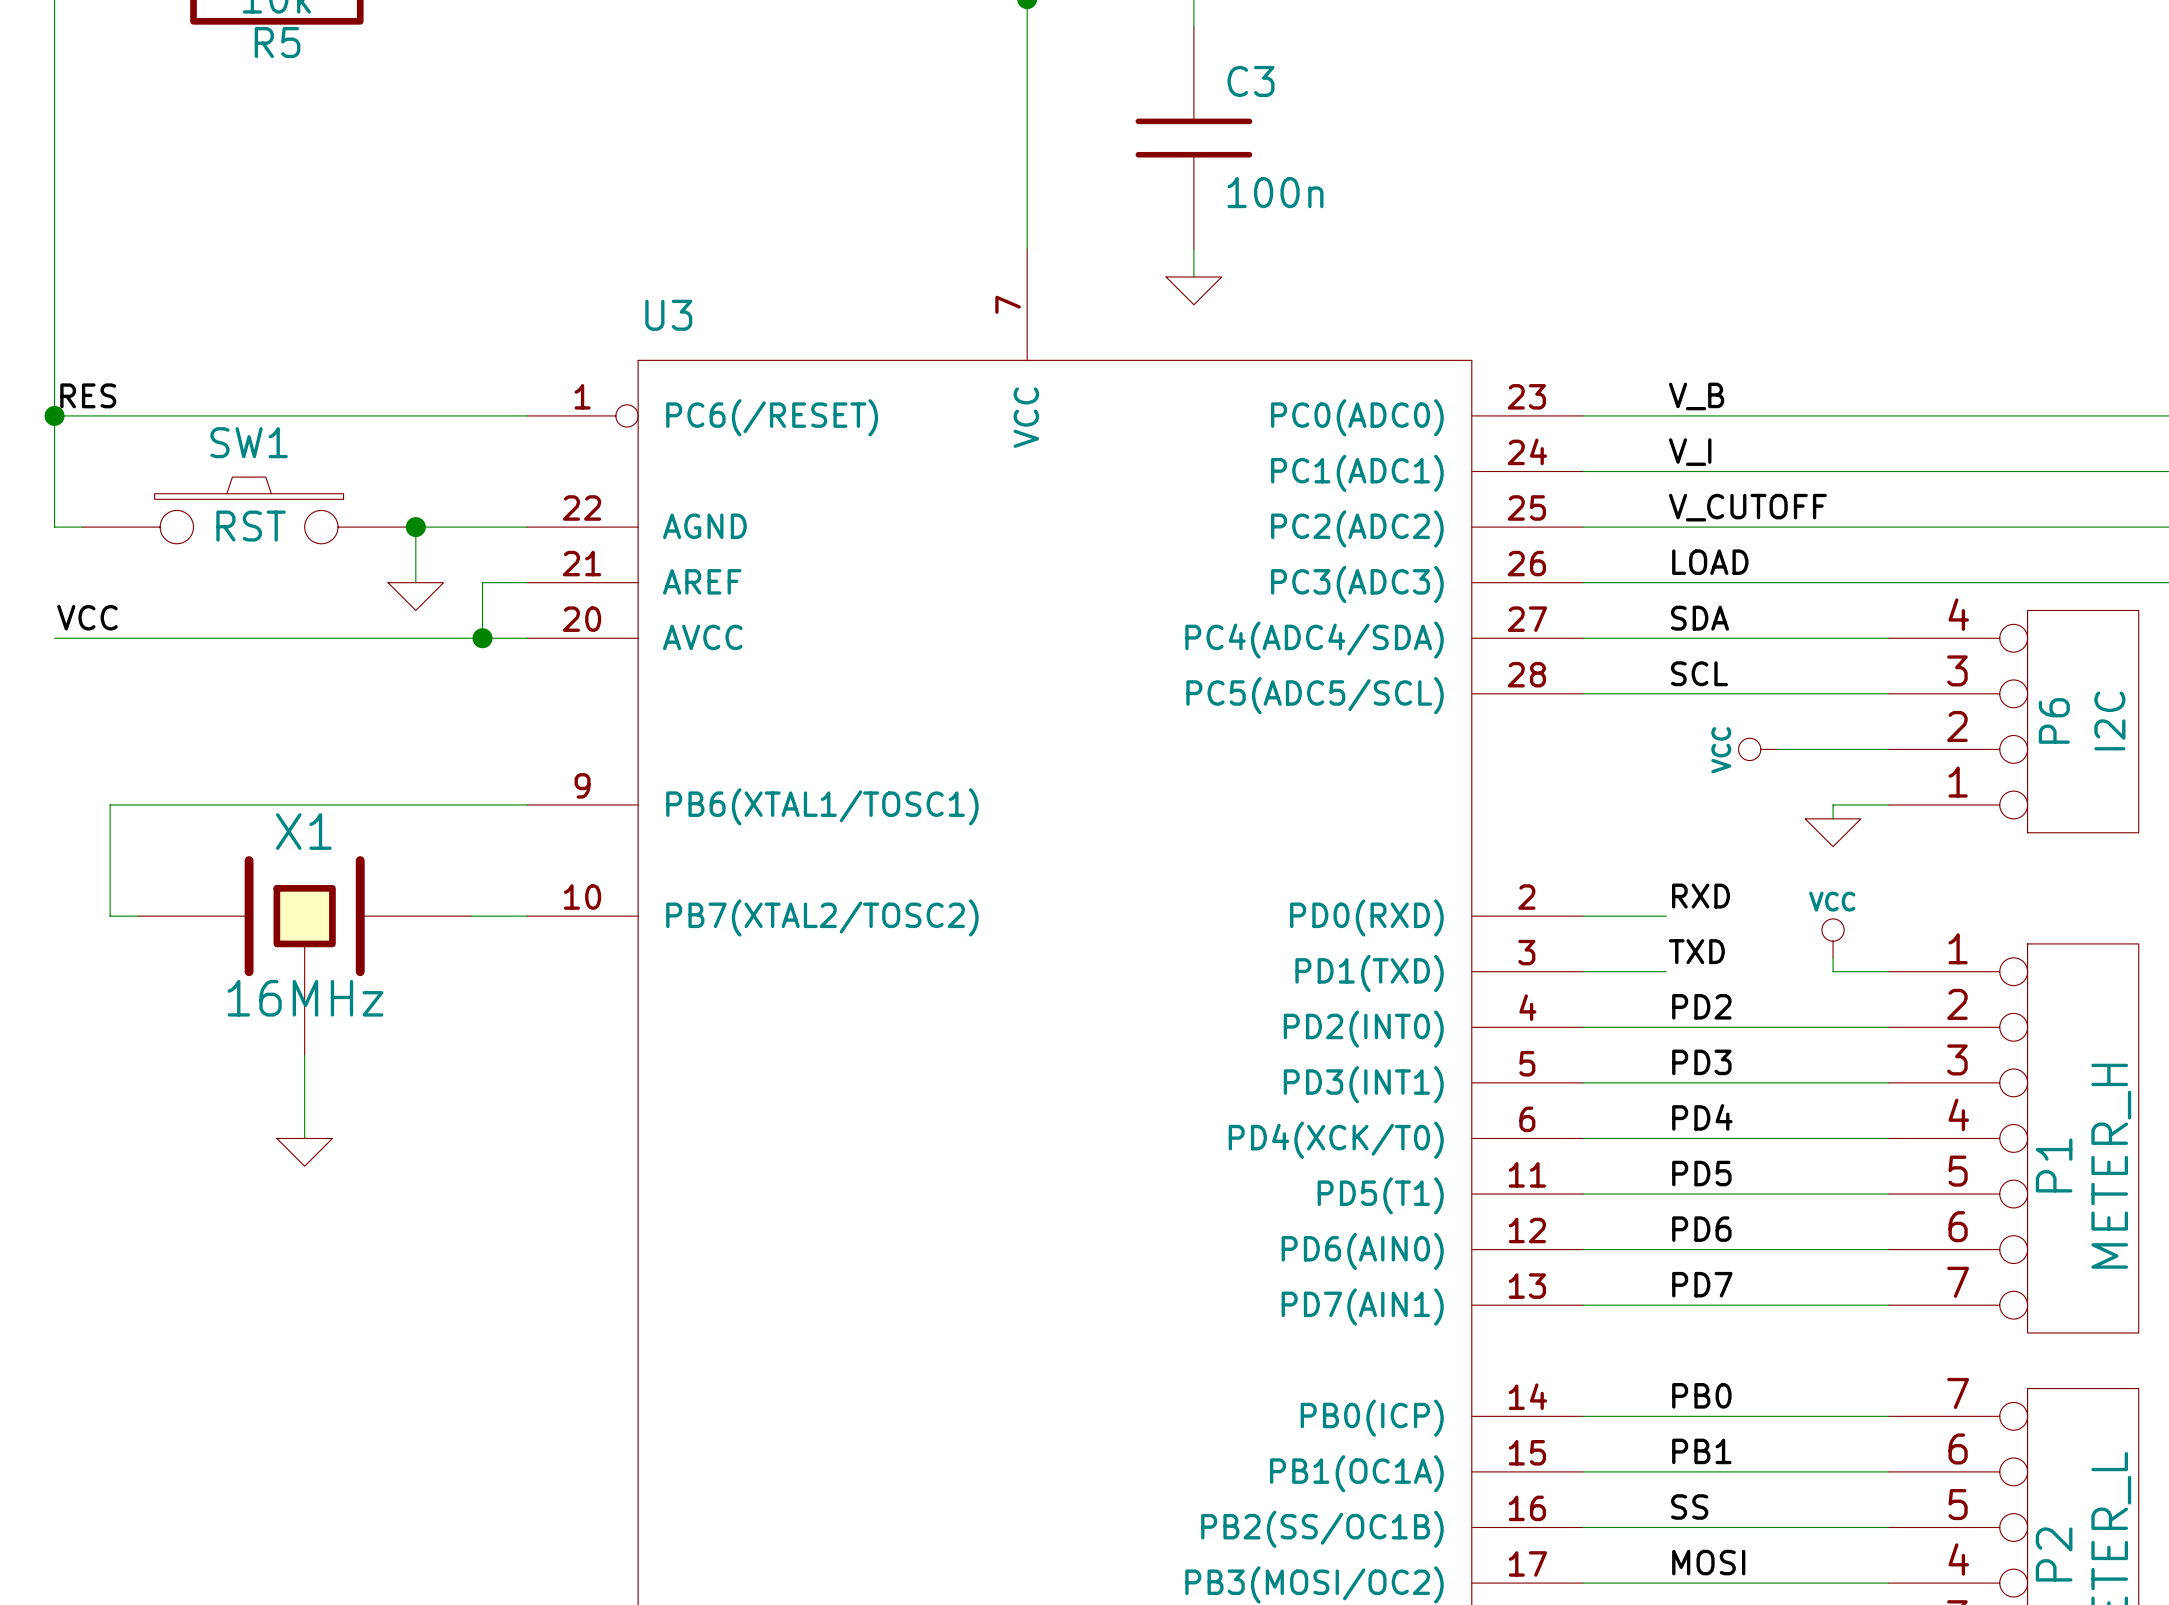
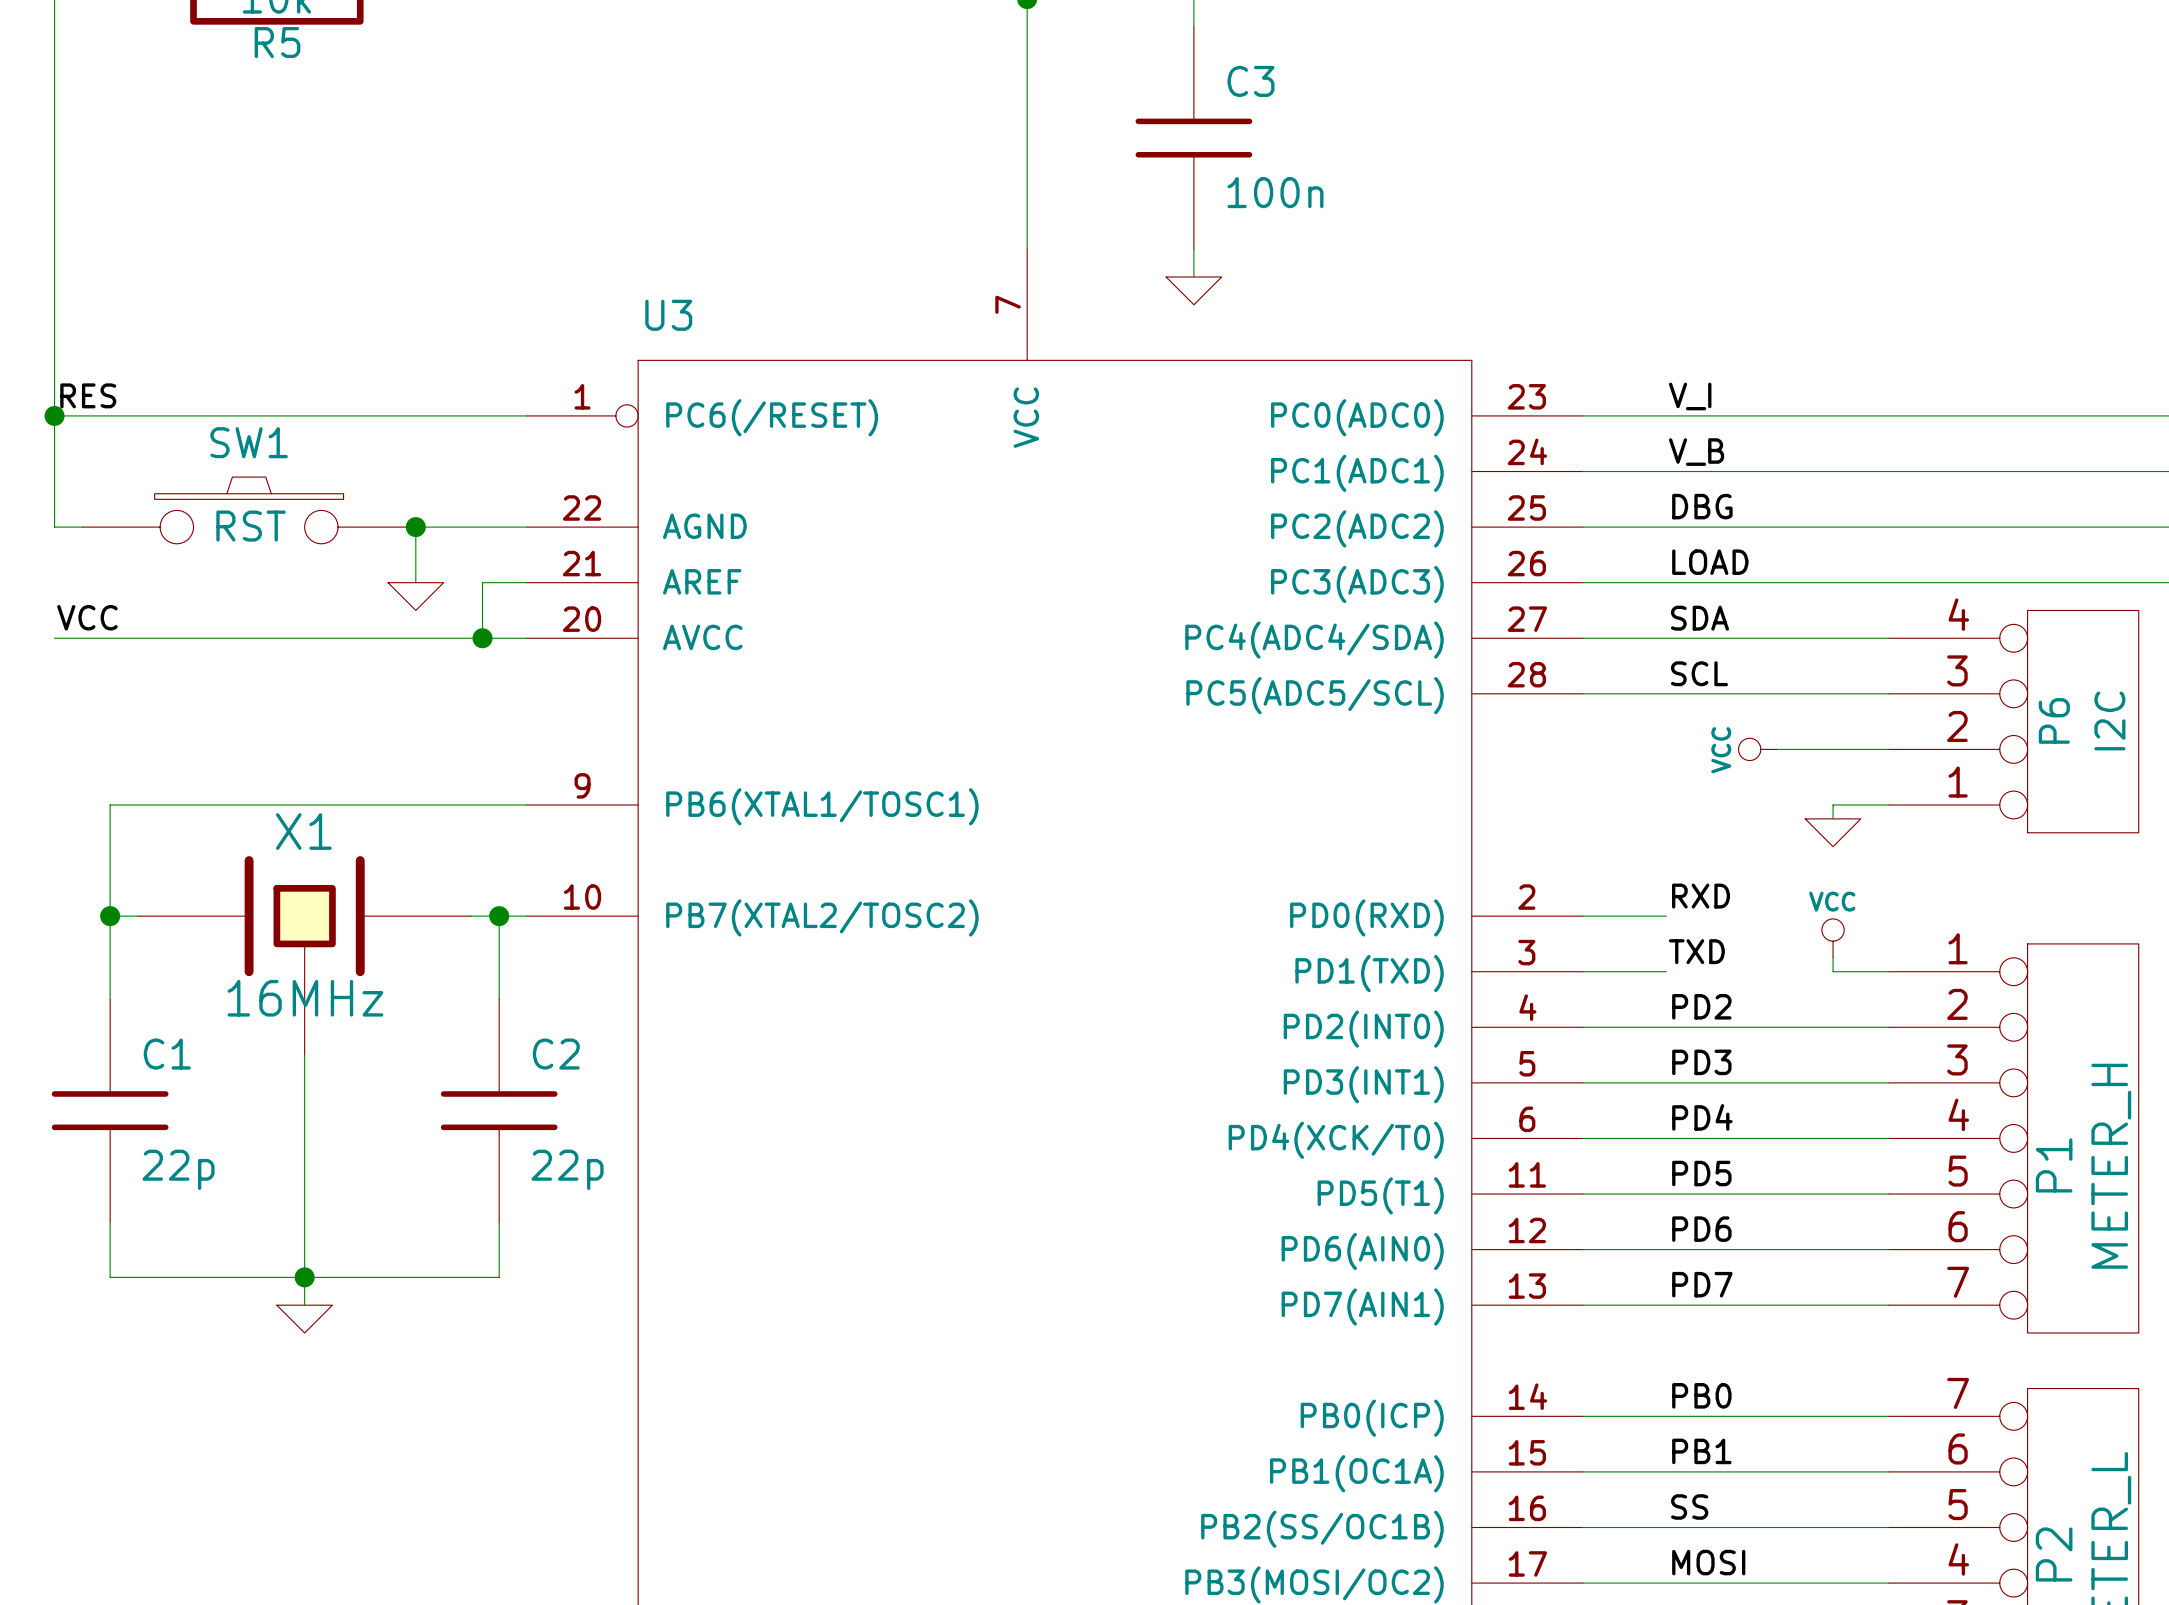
label: V_B (1696, 396) -> V_I (1690, 396)
label: V_I (1690, 452) -> V_B (1696, 452)
label: V_CUTOFF (1747, 507) -> DBG (1702, 506)
wire: none -> (110, 916) (110, 999)
junction: none -> (110, 916)
wire: none -> (499, 916) (499, 999)
junction: none -> (499, 916)
C1: none -> 22p (110, 1110)
C2: none -> 22p (499, 1110)
wire: none -> (304, 1138) (304, 1305)
power symbol position: (304, 1152) -> (304, 1319)
wire: none -> (110, 1221) (110, 1277) (499, 1277) (499, 1221)
junction: none -> (304, 1277)

